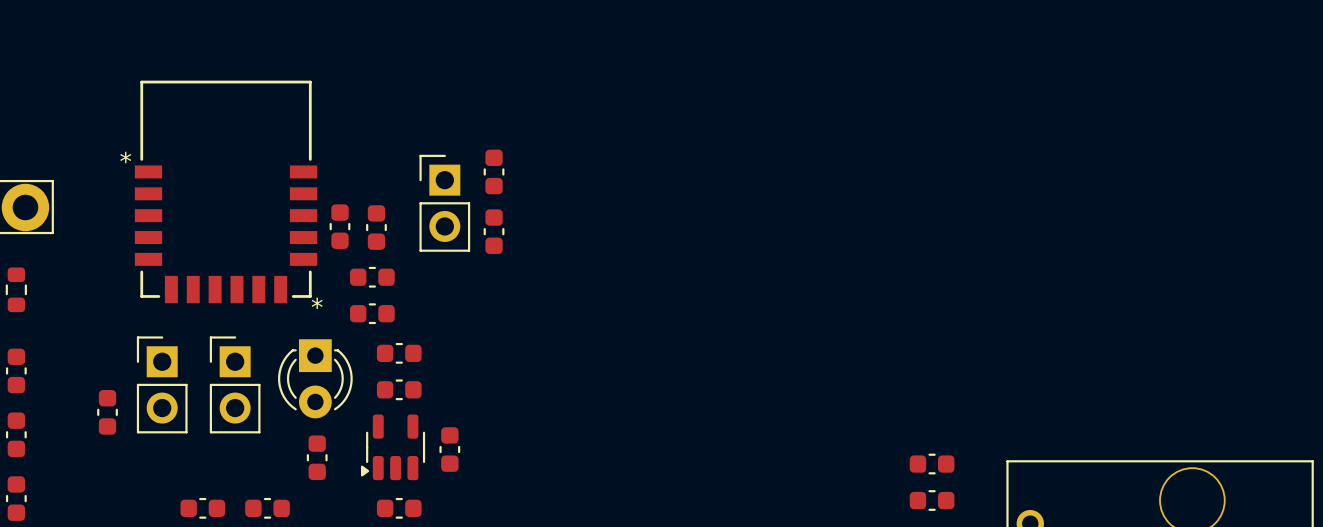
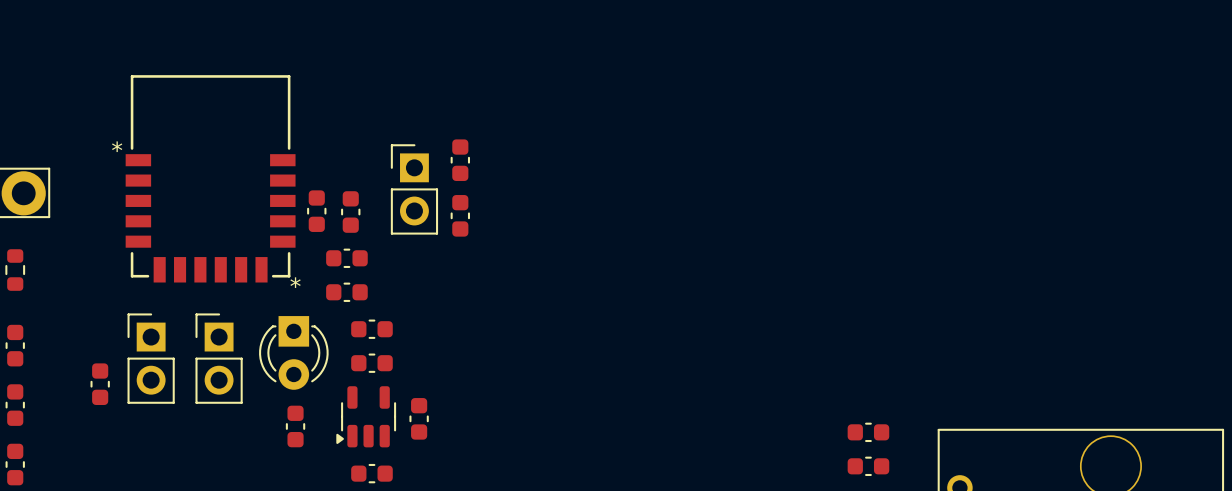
part: (202, 508) -> none
part: (267, 508) -> none

